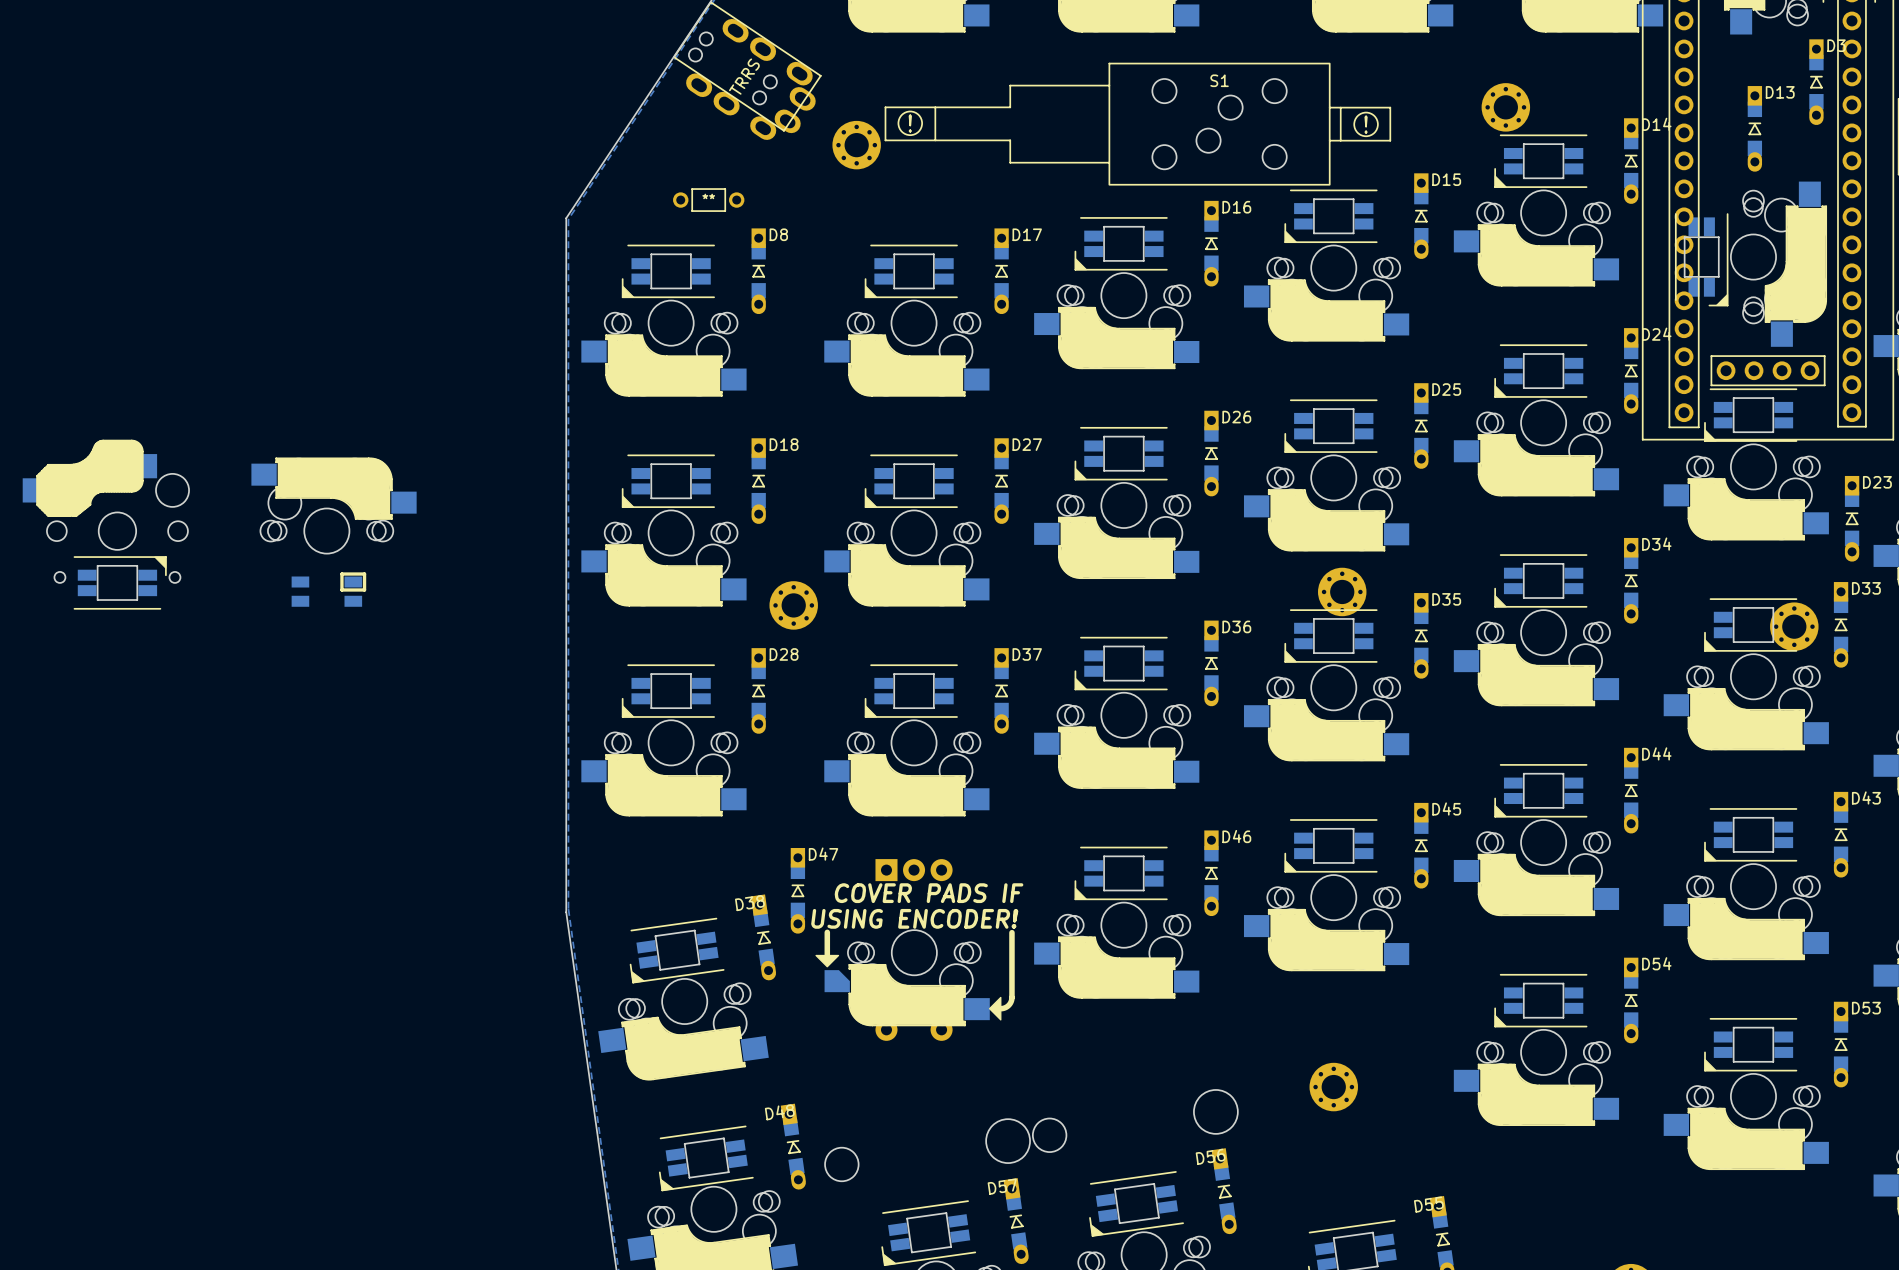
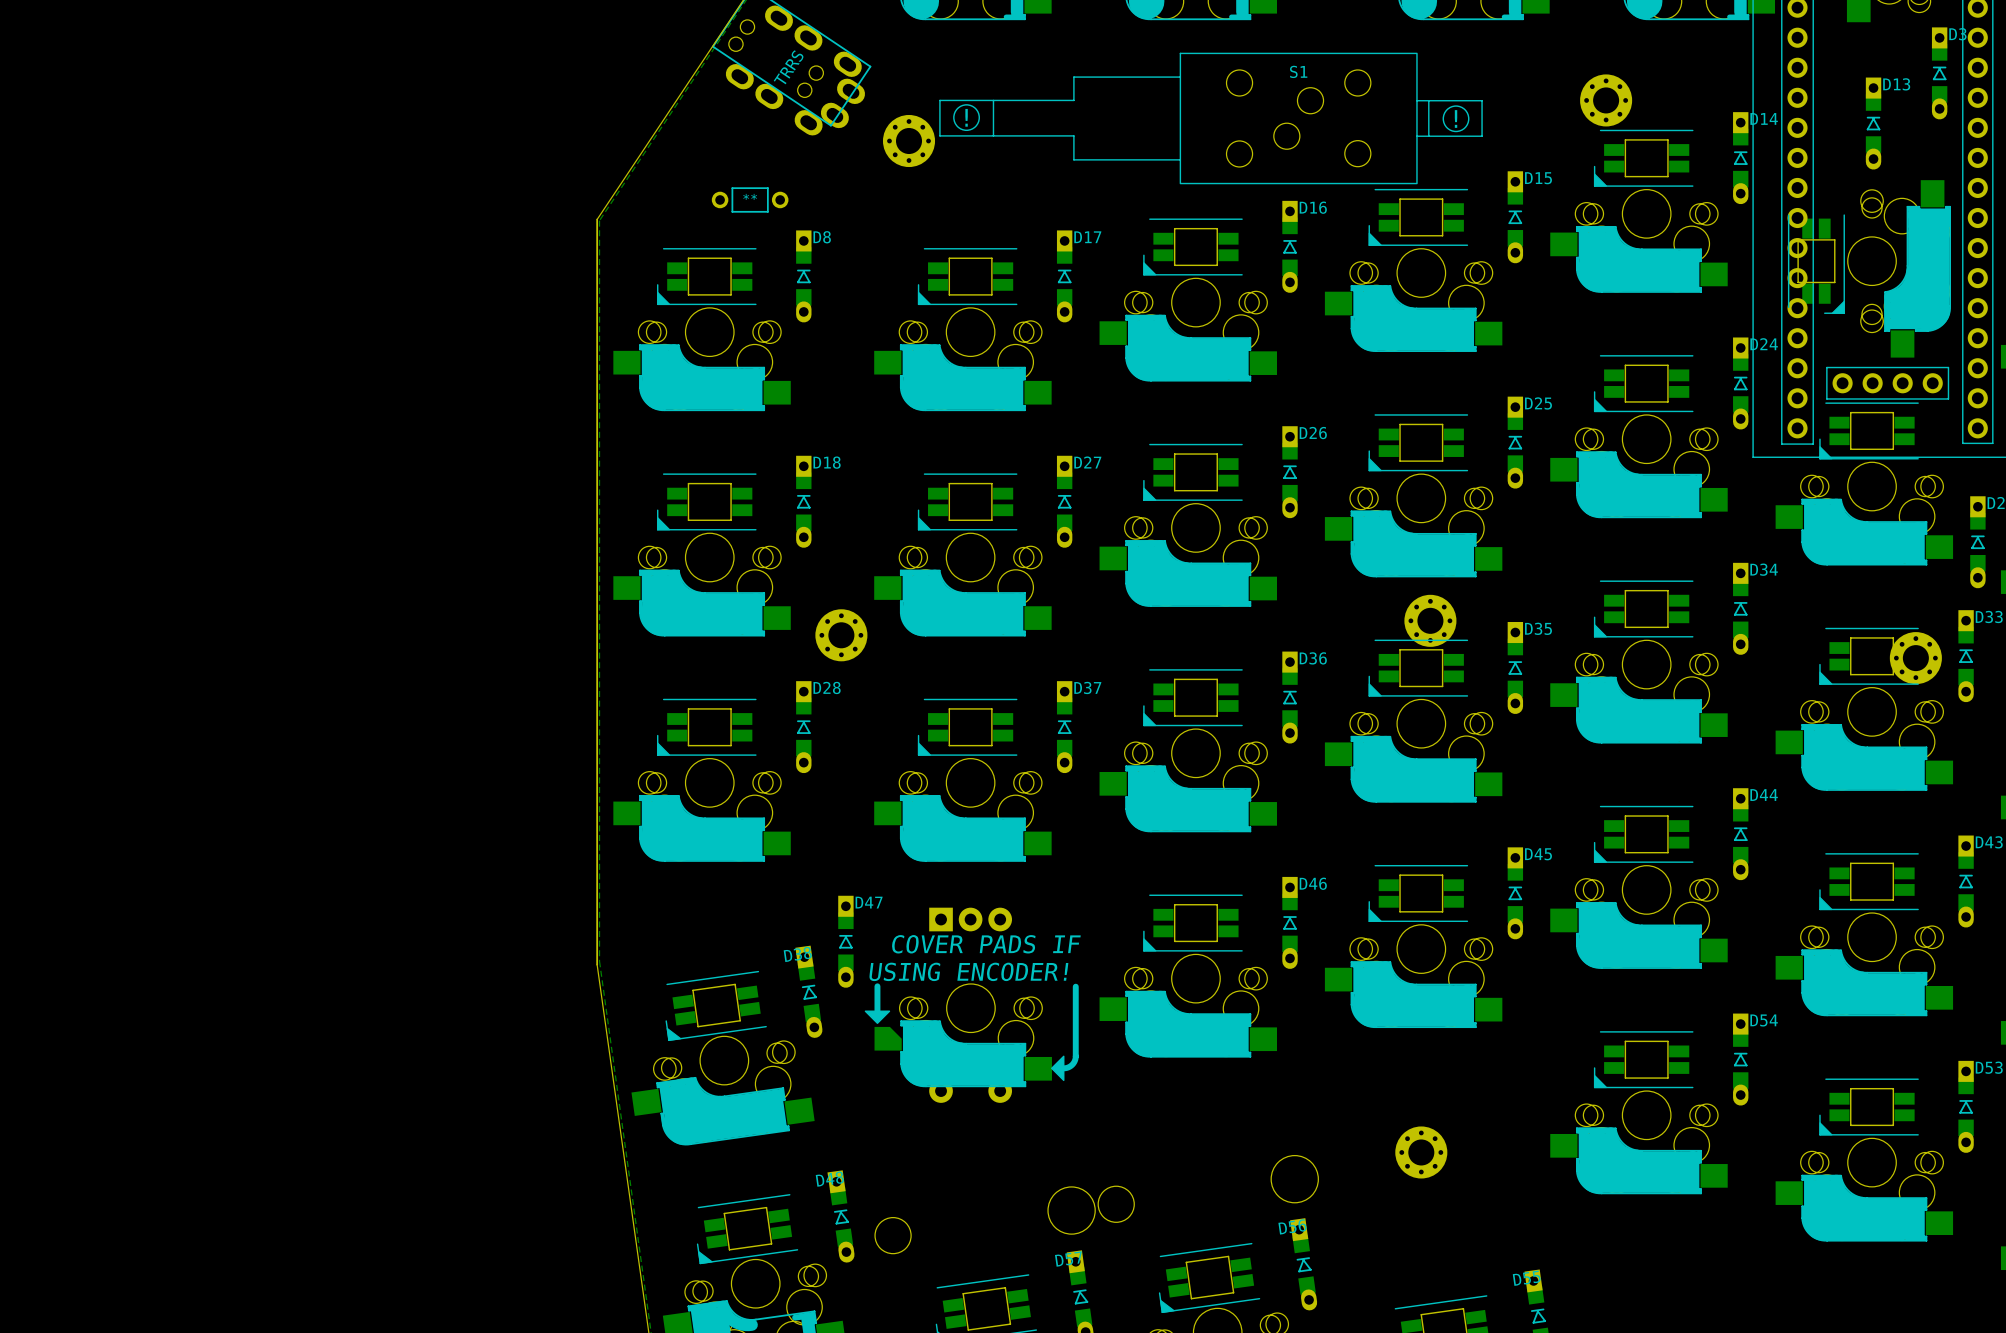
part: (105, 524) -> none
part: (334, 532) -> none

